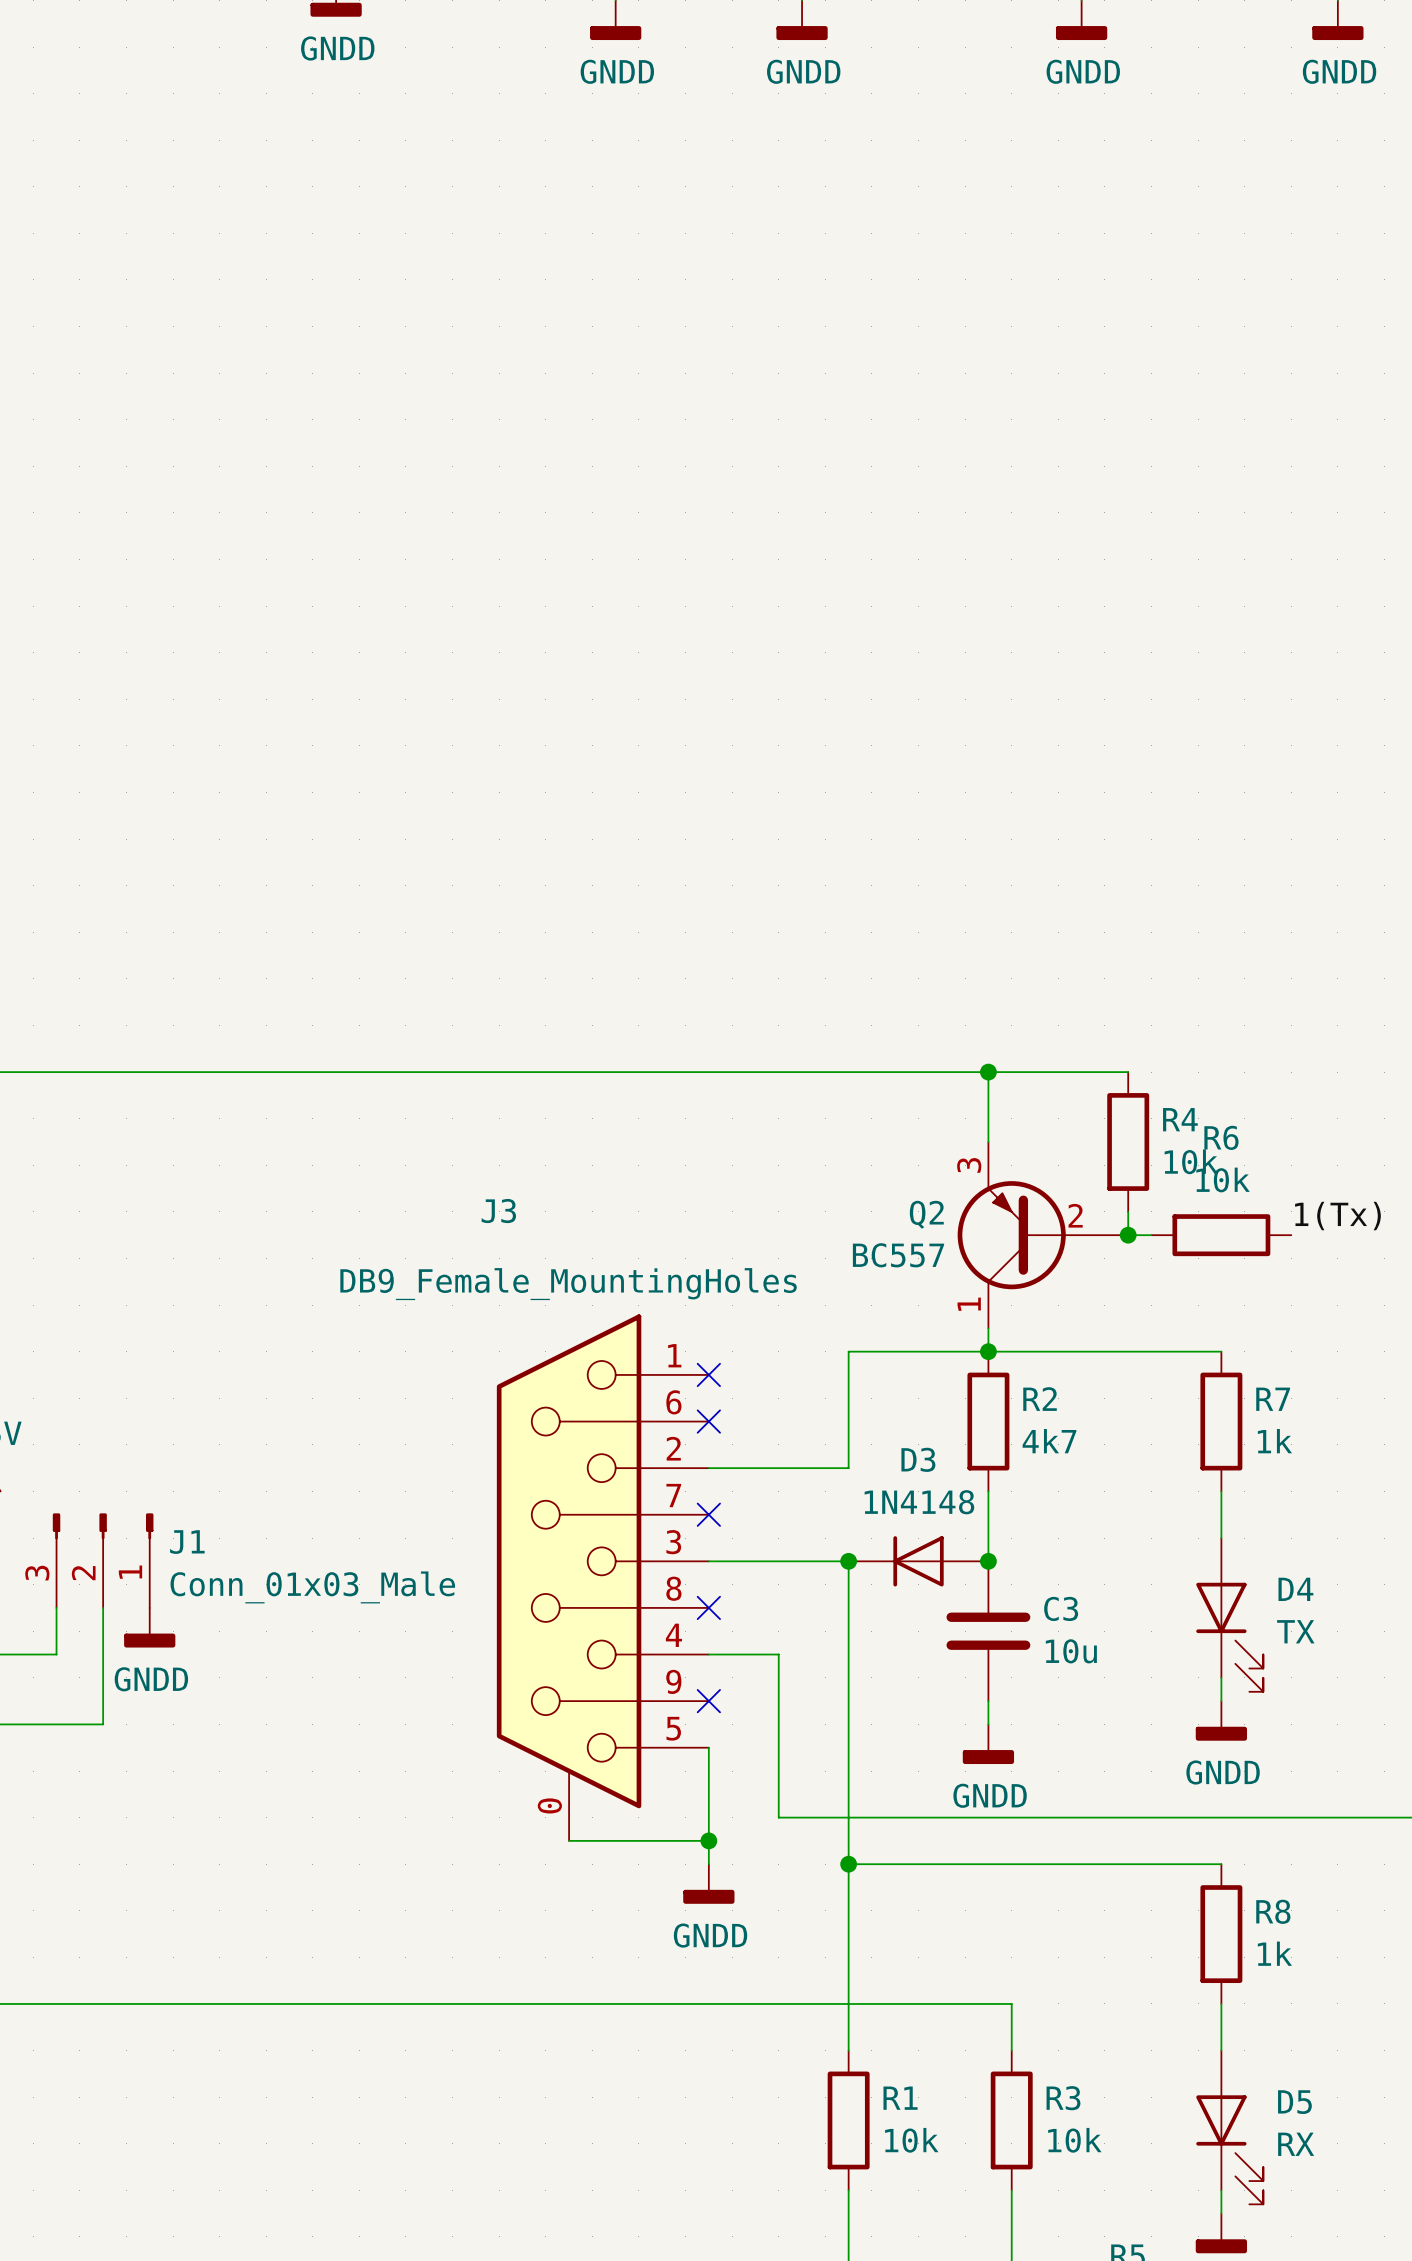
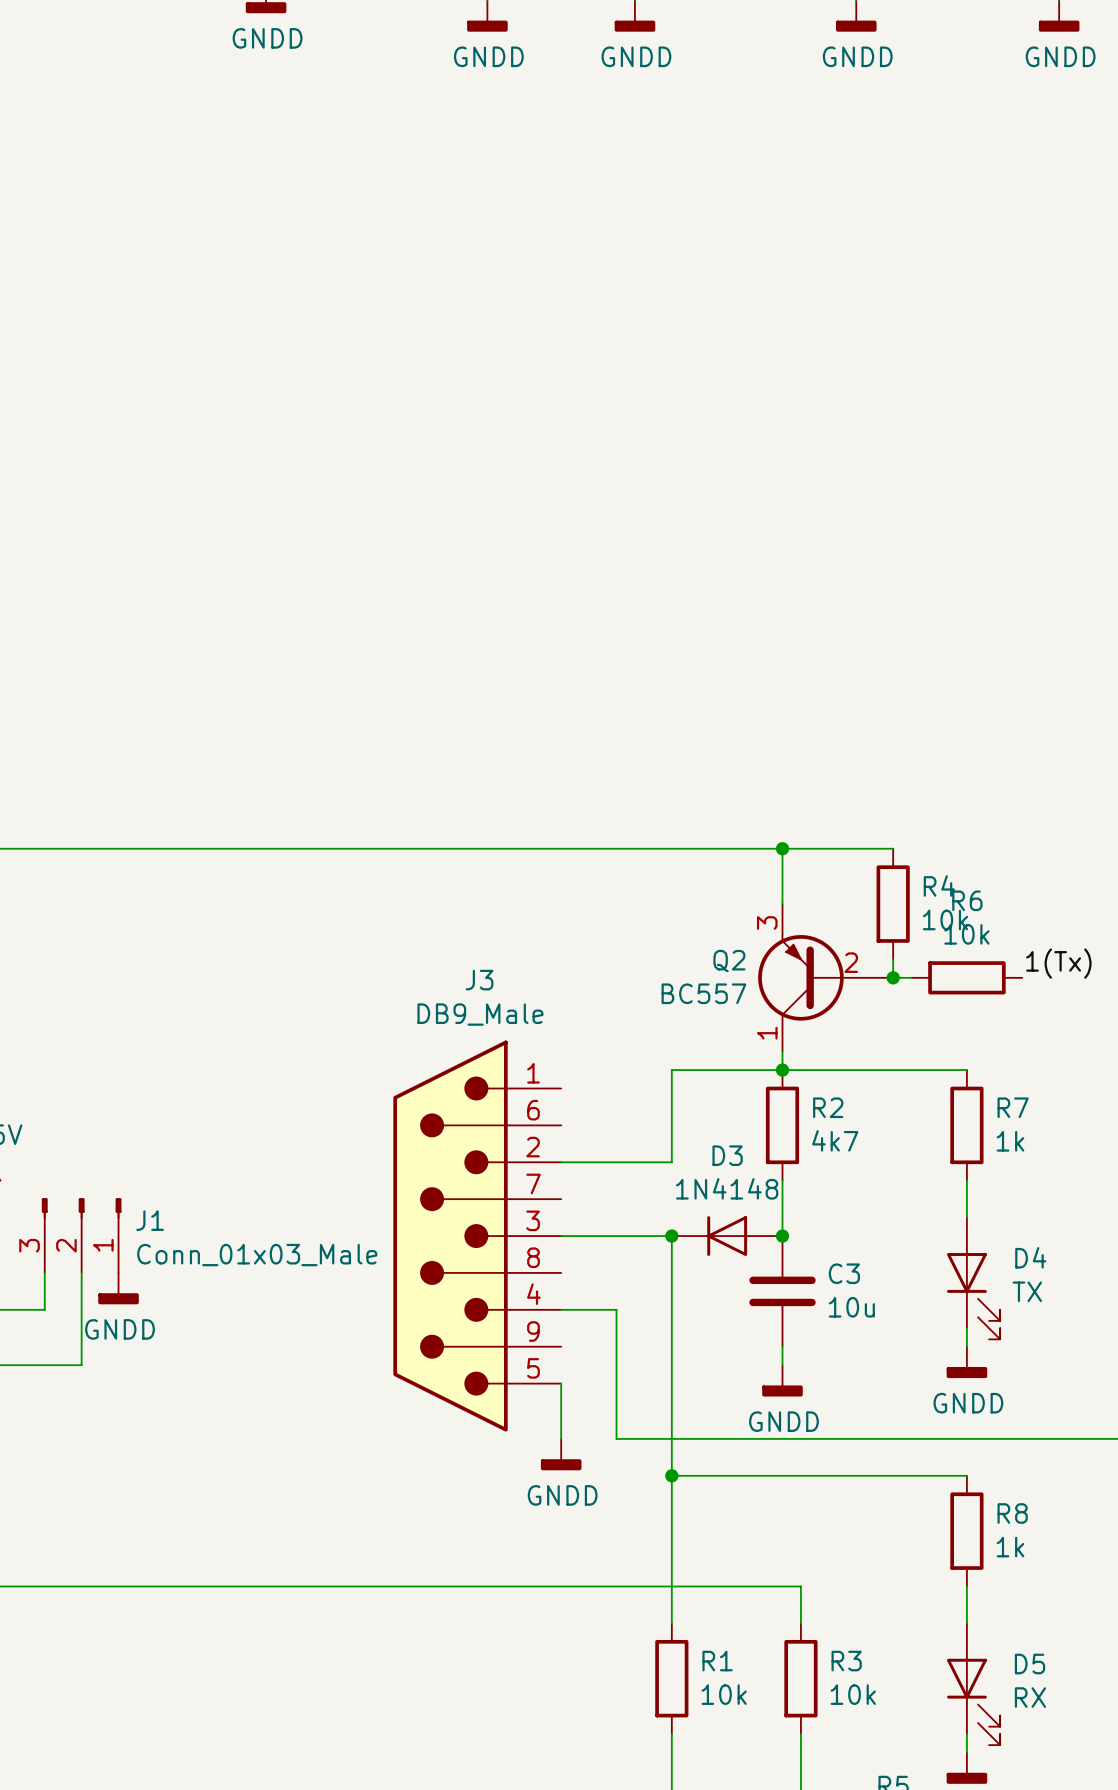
J3 name position: J3 (498, 1211) -> J3 (479, 980)
J3 value: DB9_Female_MountingHoles (568, 1284) -> DB9_Male (480, 1014)
J3 symbol: [496, 1314, 709, 1841] -> [393, 1040, 562, 1432]
no-connect mark: (708, 1374) -> none
no-connect mark: (708, 1421) -> none
no-connect mark: (708, 1514) -> none
no-connect mark: (708, 1607) -> none
no-connect mark: (708, 1701) -> none
wire: (569, 1840) (708, 1840) -> none
junction: (708, 1840) -> none
power symbol position: GNDD (708, 1884) -> GNDD (561, 1454)

